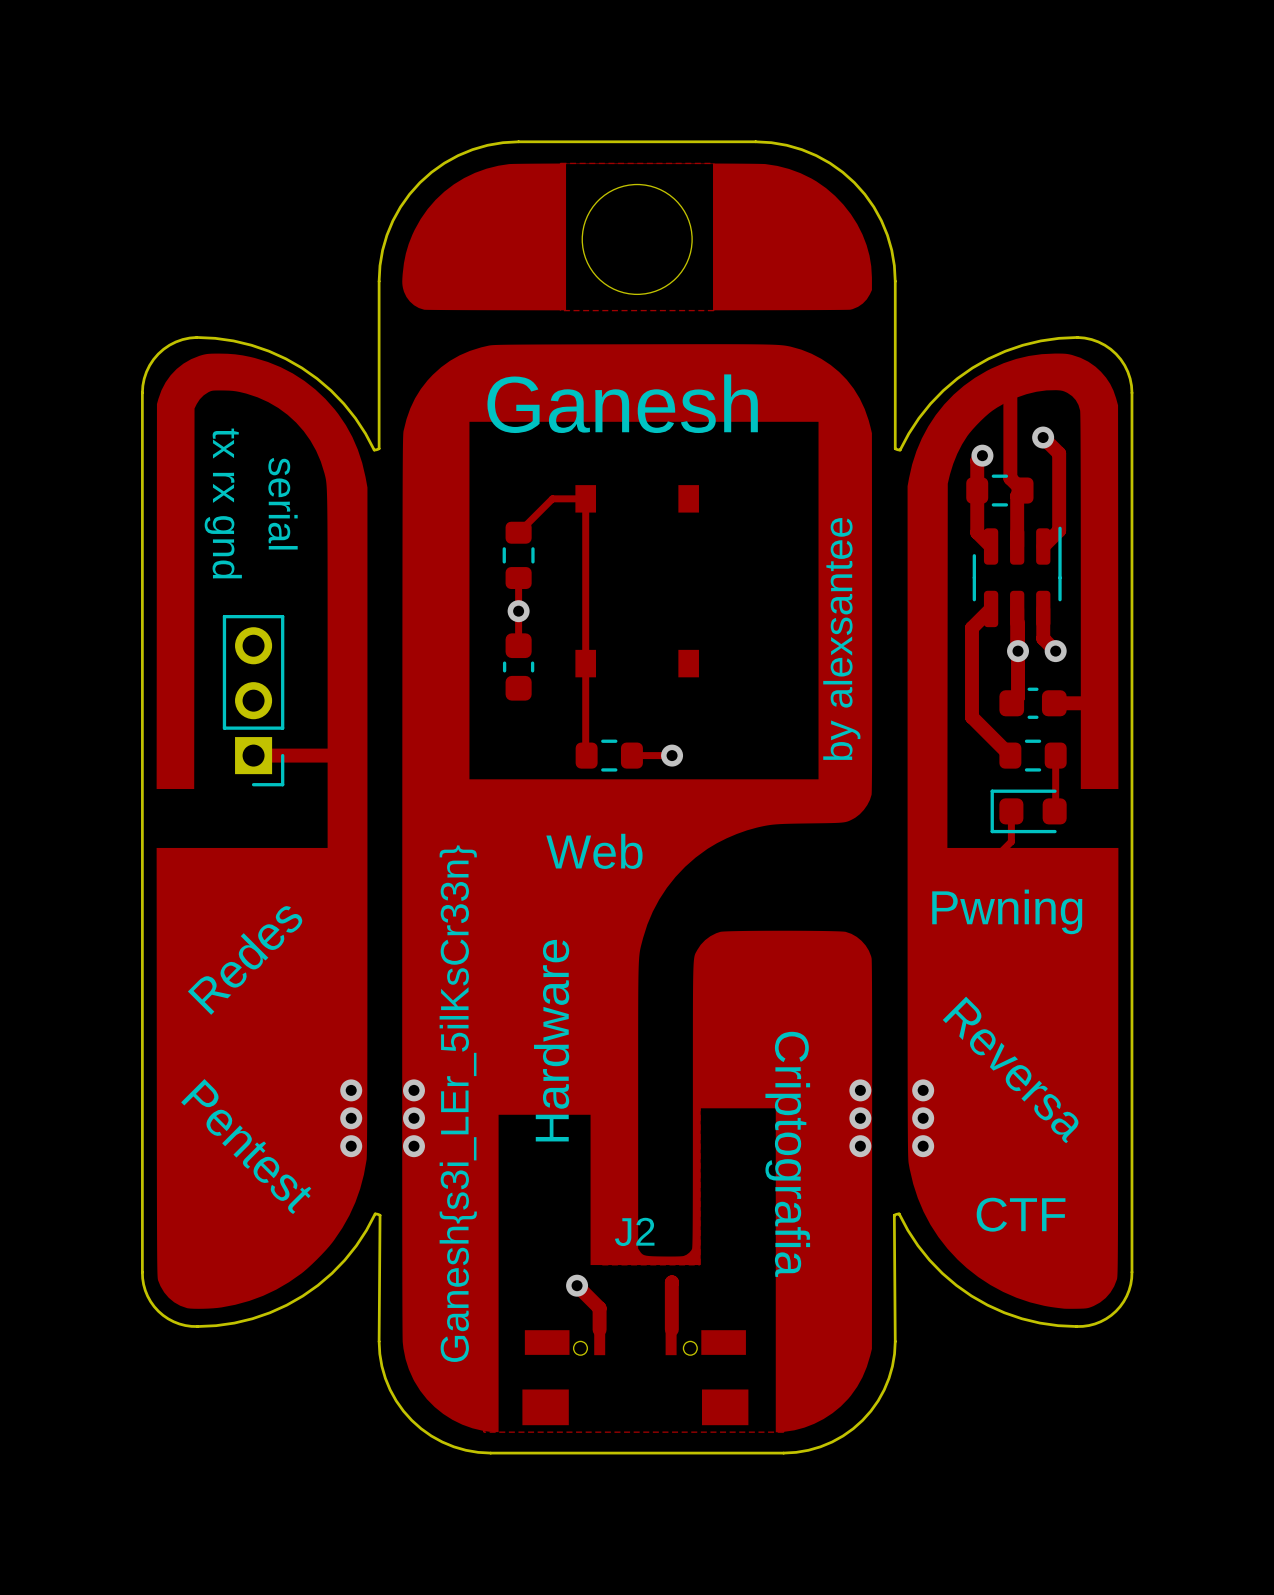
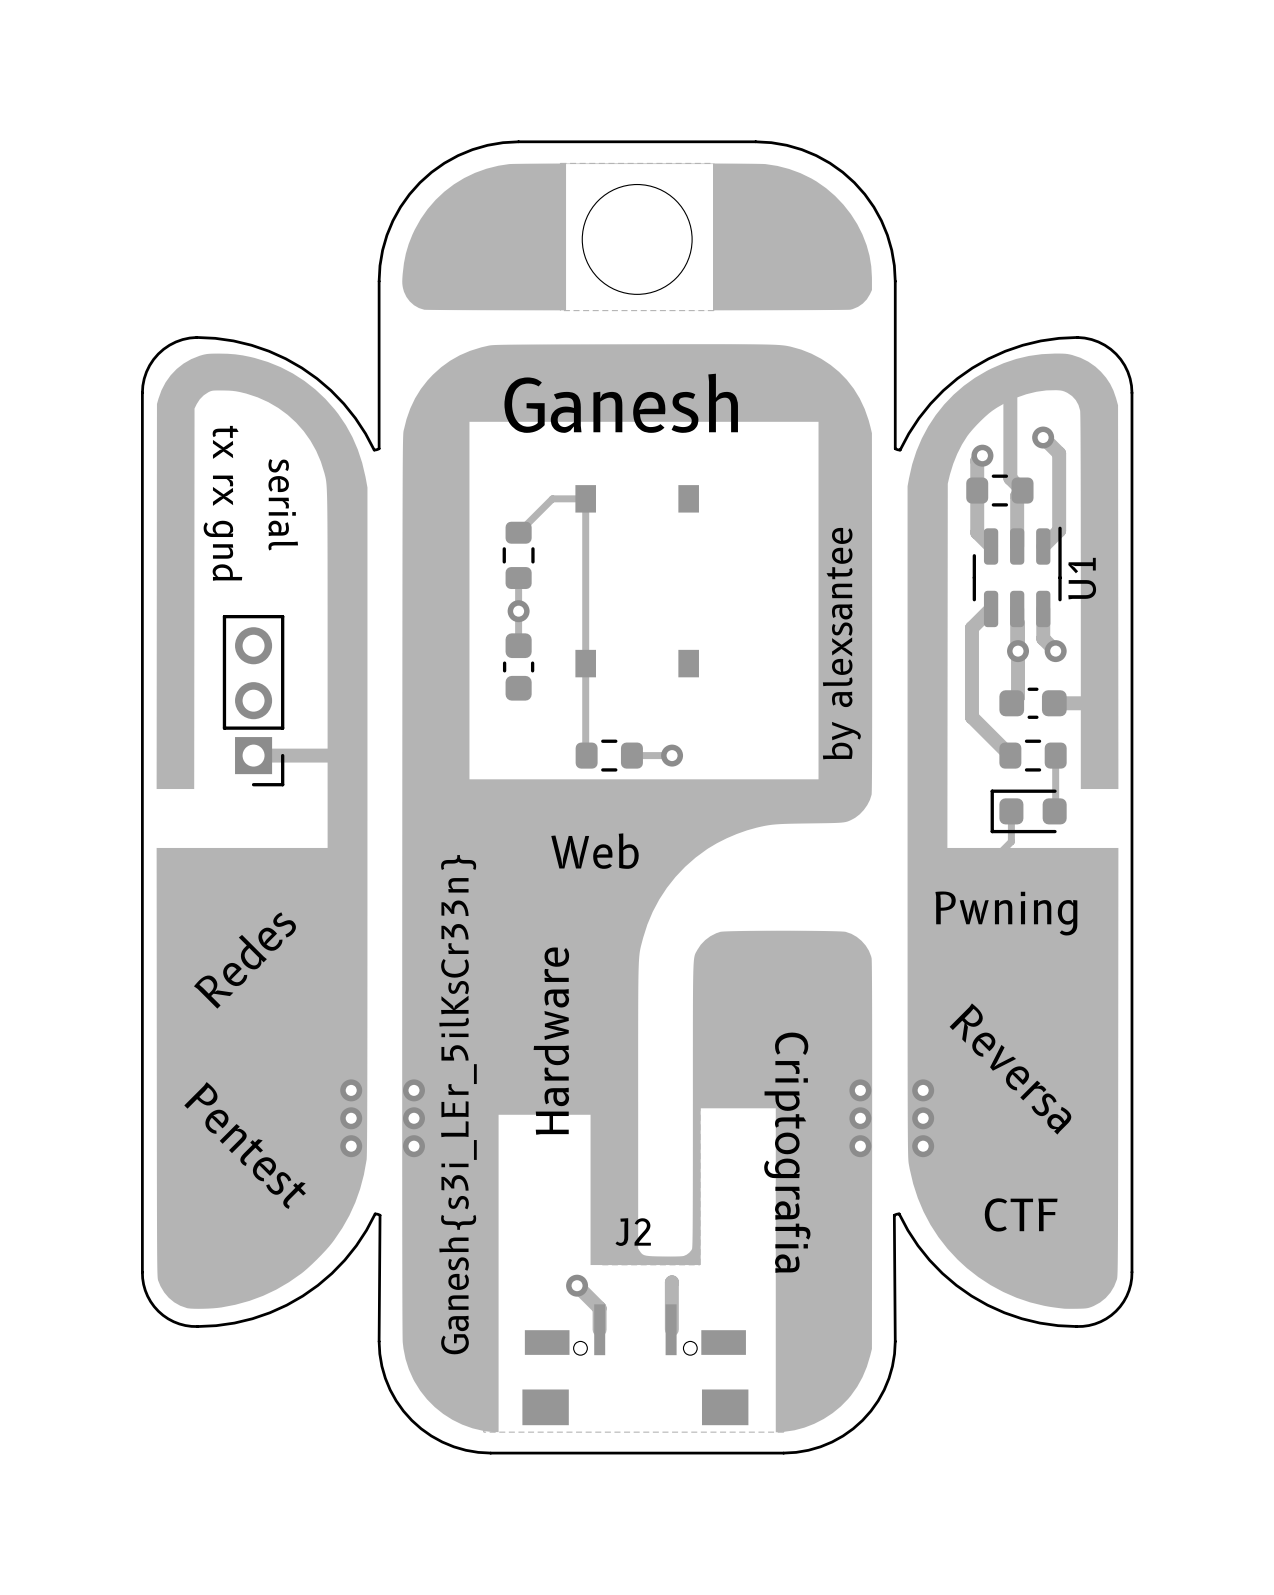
U1 name: none -> U1 (1082, 578)

